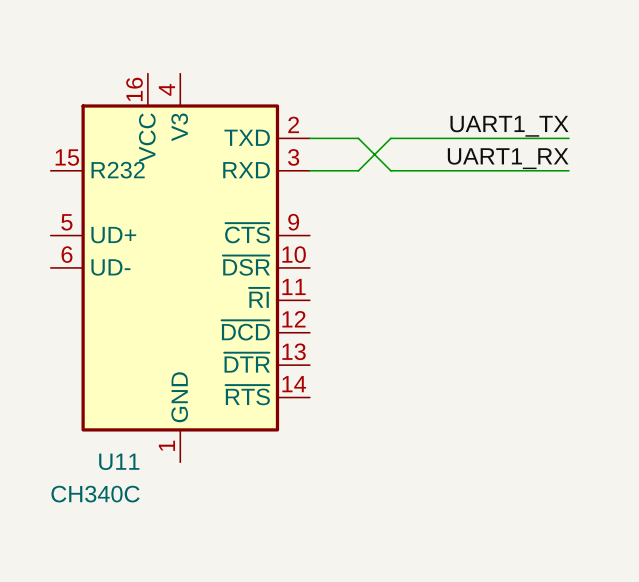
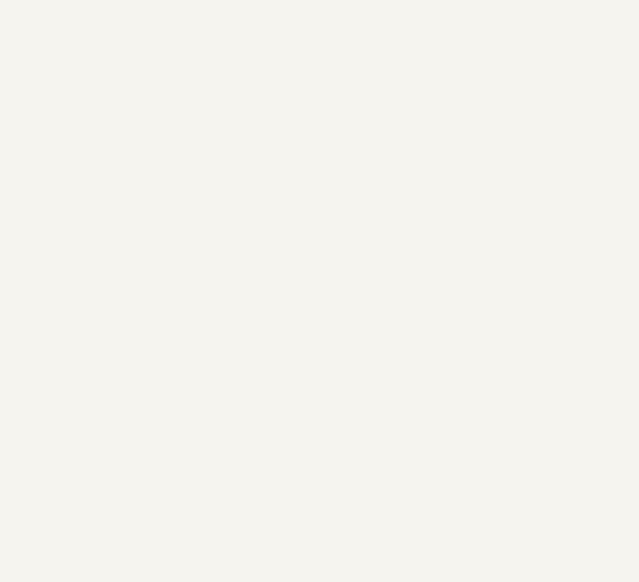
label: UART1_TX (509, 126) -> none
wire: (309, 138) (358, 138) (390, 170) (569, 170) -> none
wire: (569, 138) (390, 138) (358, 170) (309, 170) -> none
label: UART1_RX (508, 158) -> none
U11: CH340C (180, 267) -> none

